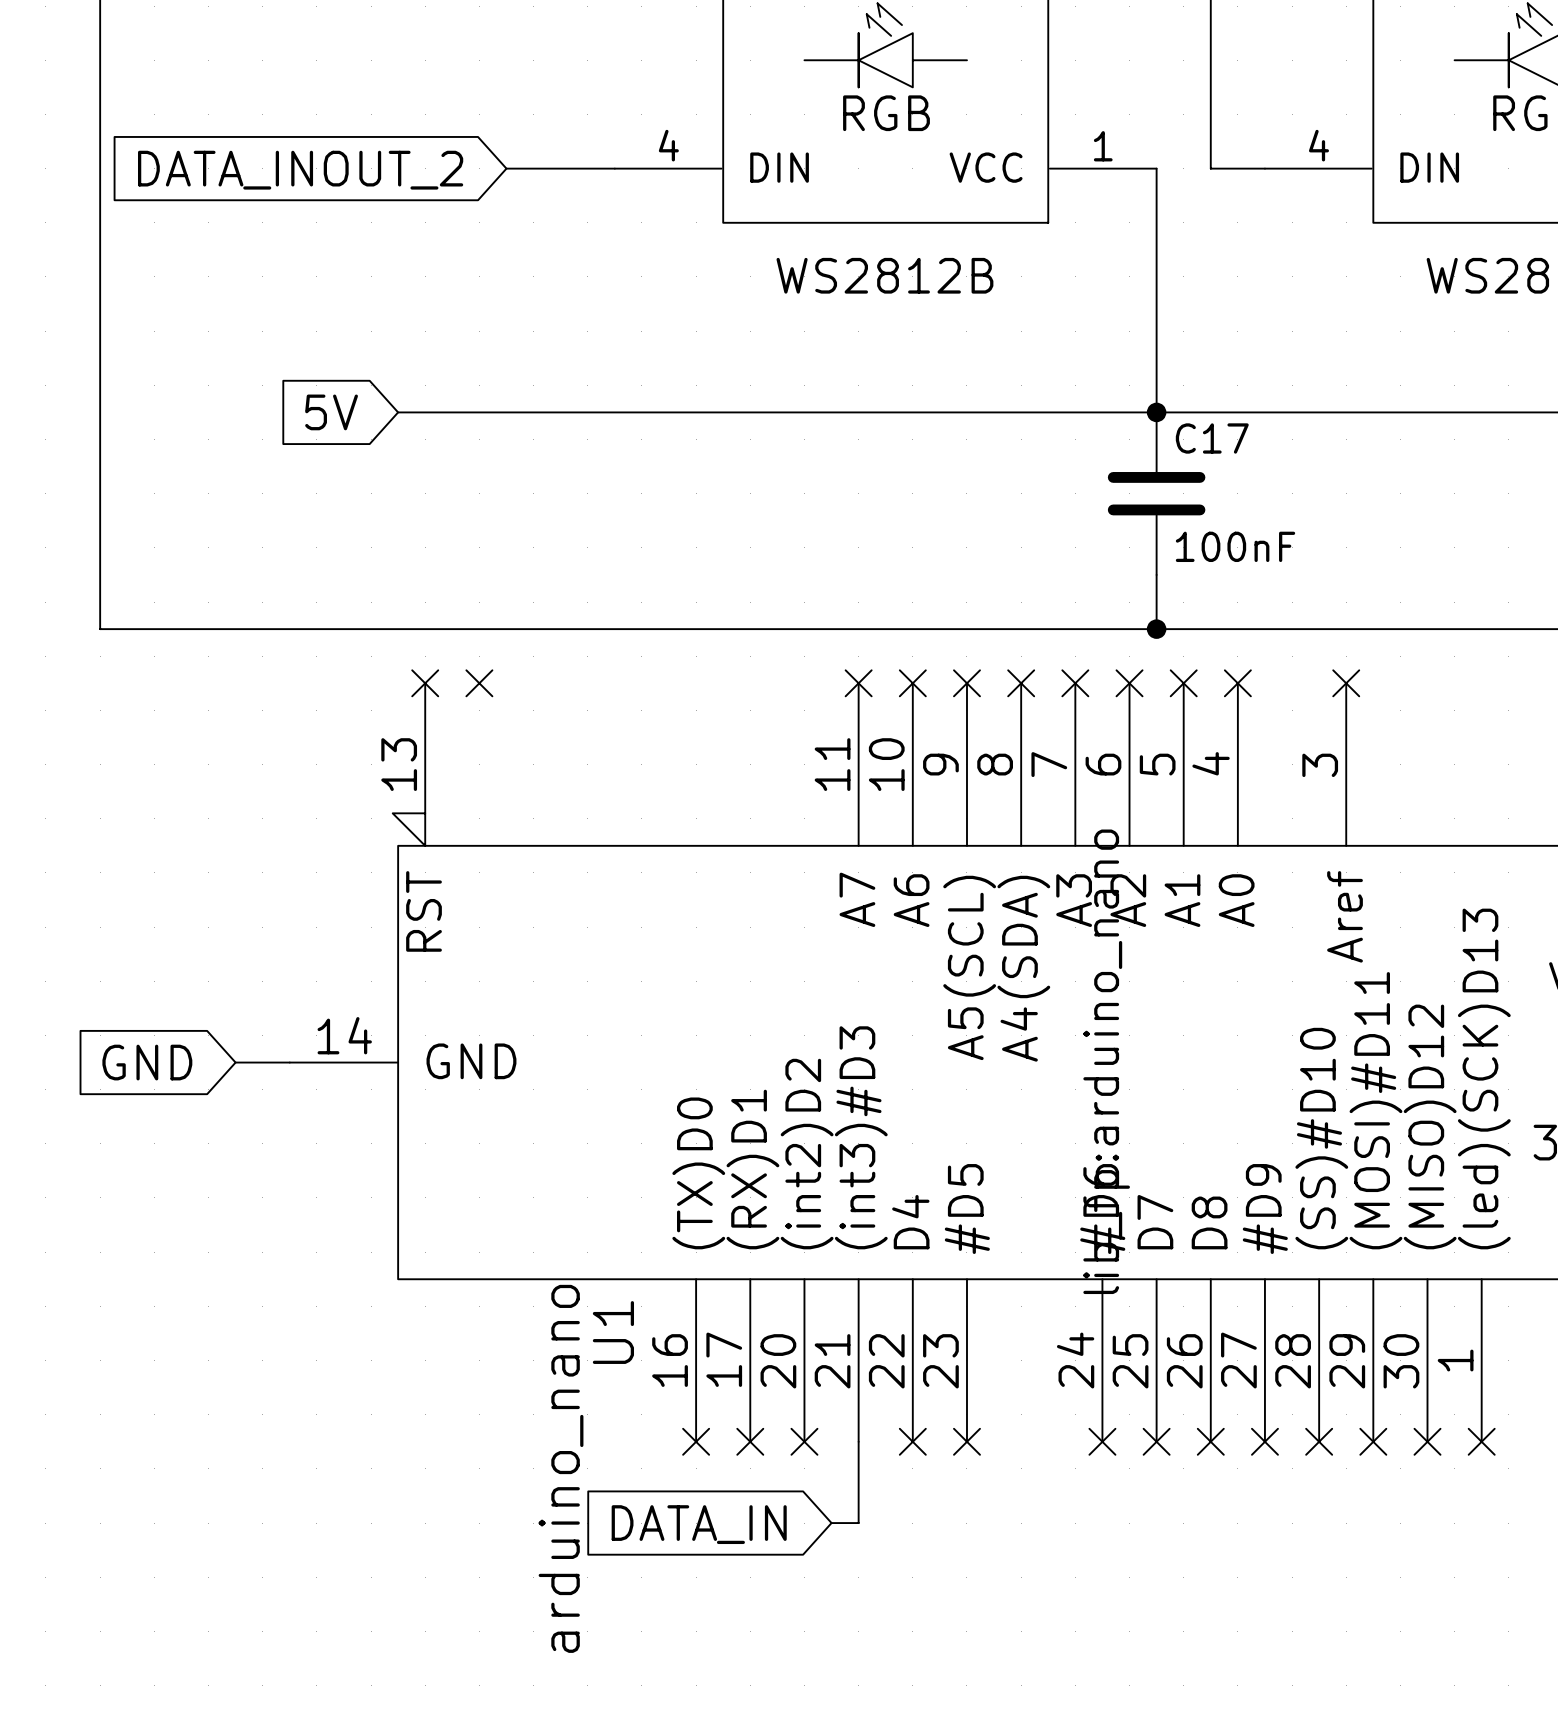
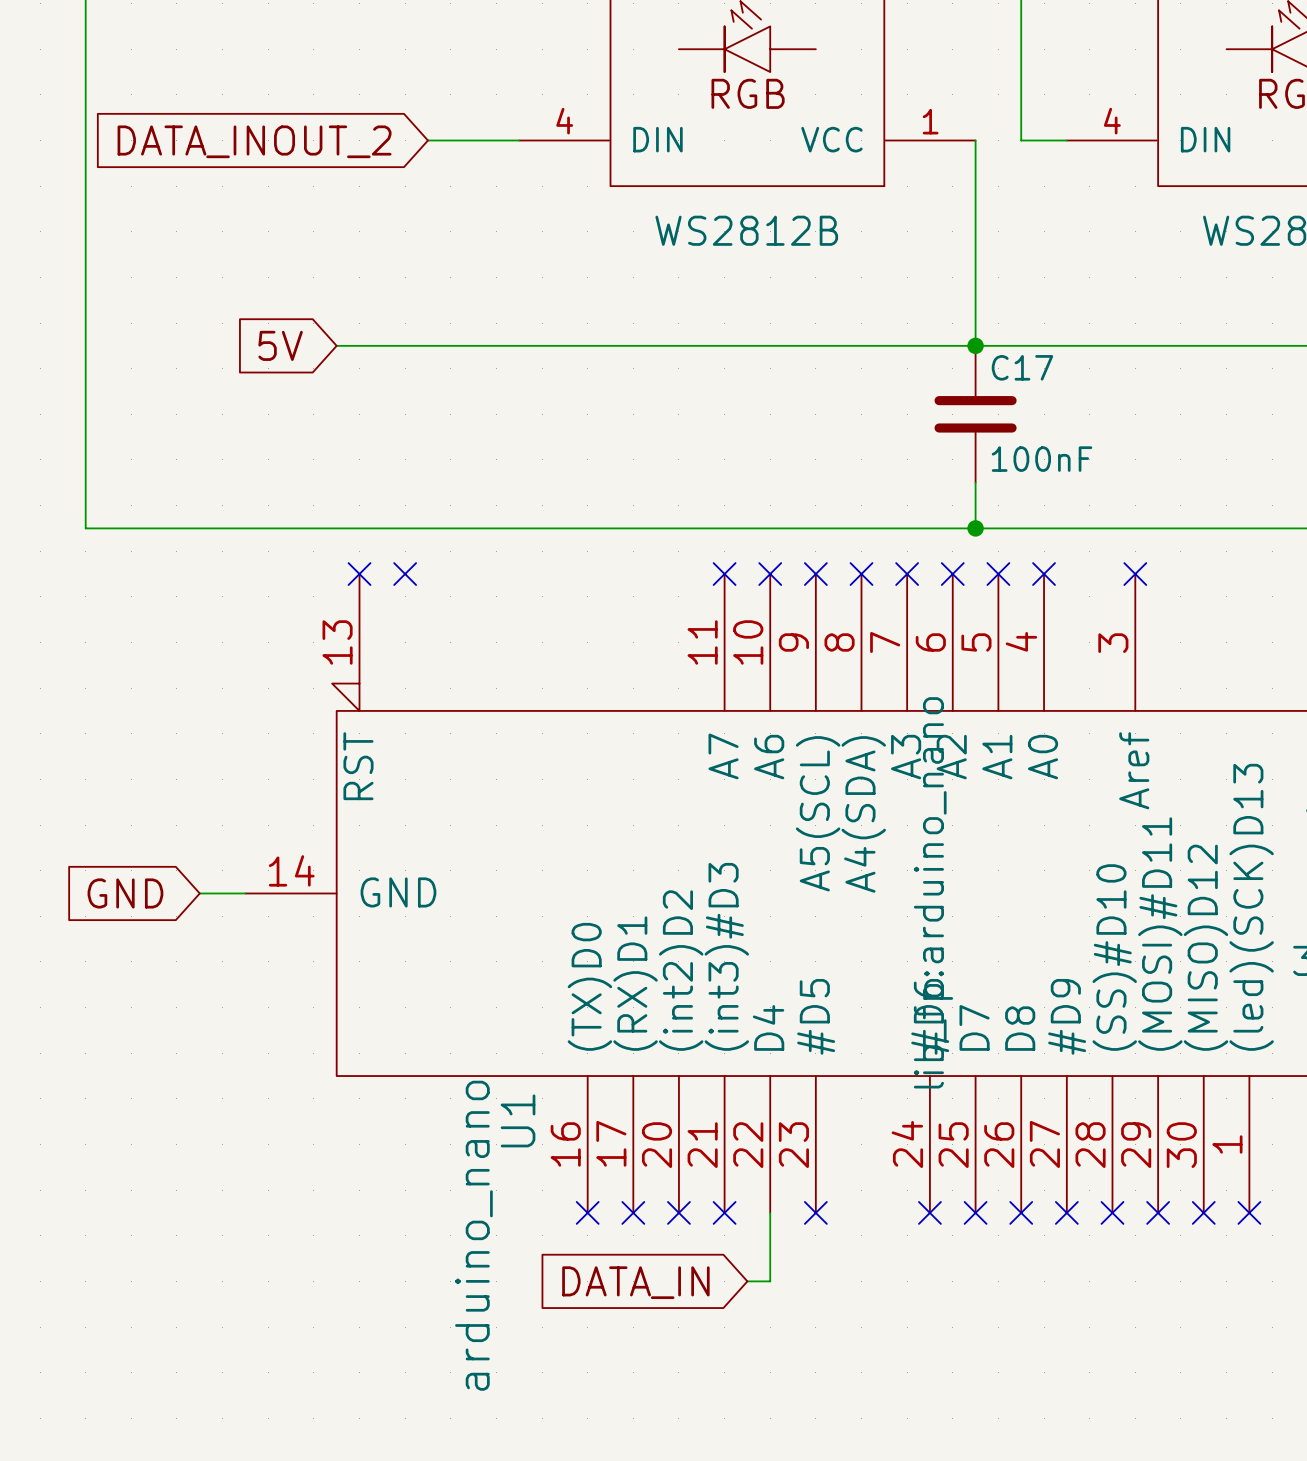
wire: (858, 1441) (858, 1523) (831, 1523) -> (770, 1212) (770, 1281) (747, 1281)
no-connect mark position: (912, 1441) -> (724, 1212)
global label position: DATA_IN (699, 1524) -> DATA_IN (635, 1282)

